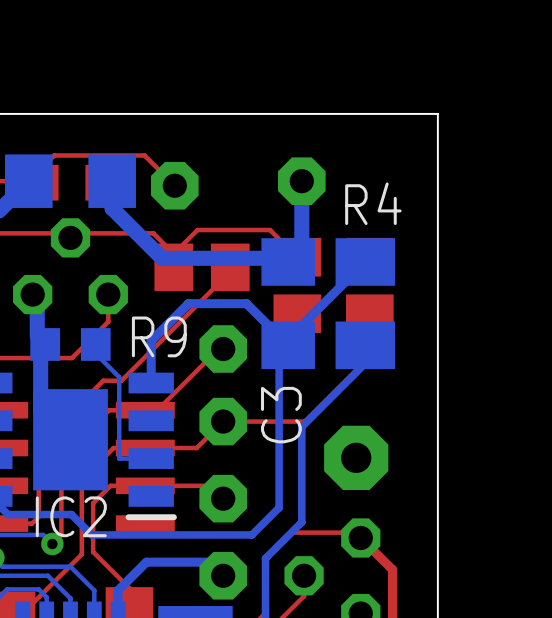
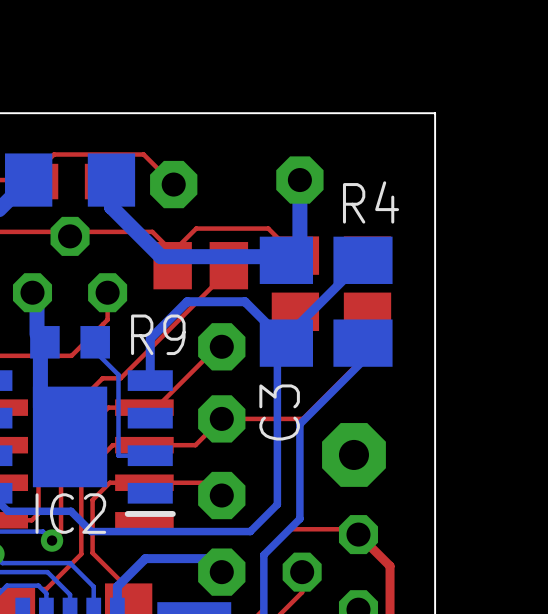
top track: (93, 552) (129, 588) (129, 606) -> (92, 548) (92, 553) (128, 589) (133, 589)
top track: (81, 554) (25, 610) (11, 610) -> (81, 550) (81, 554) (46, 589) (43, 589)

